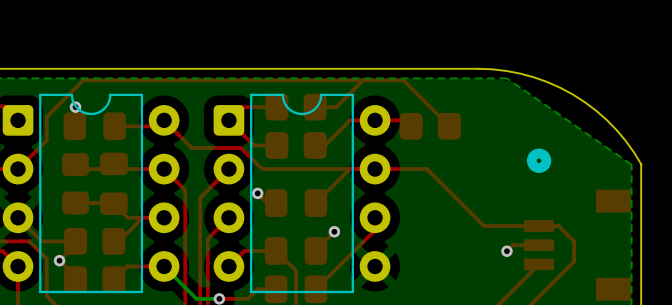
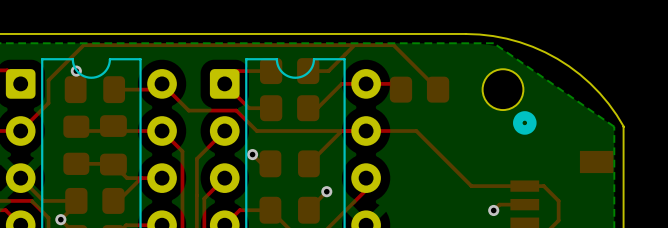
part: none -> (503, 89)

